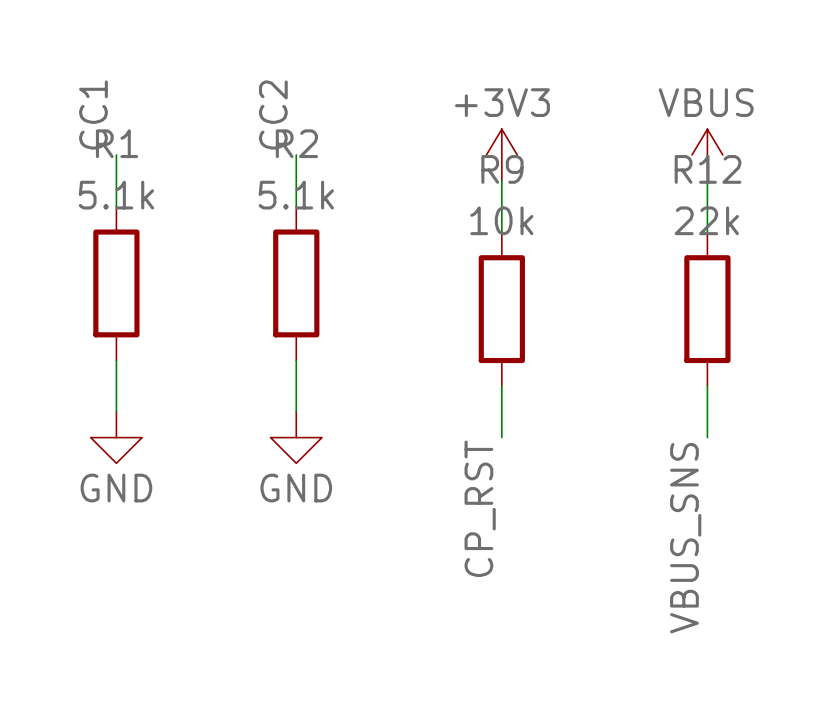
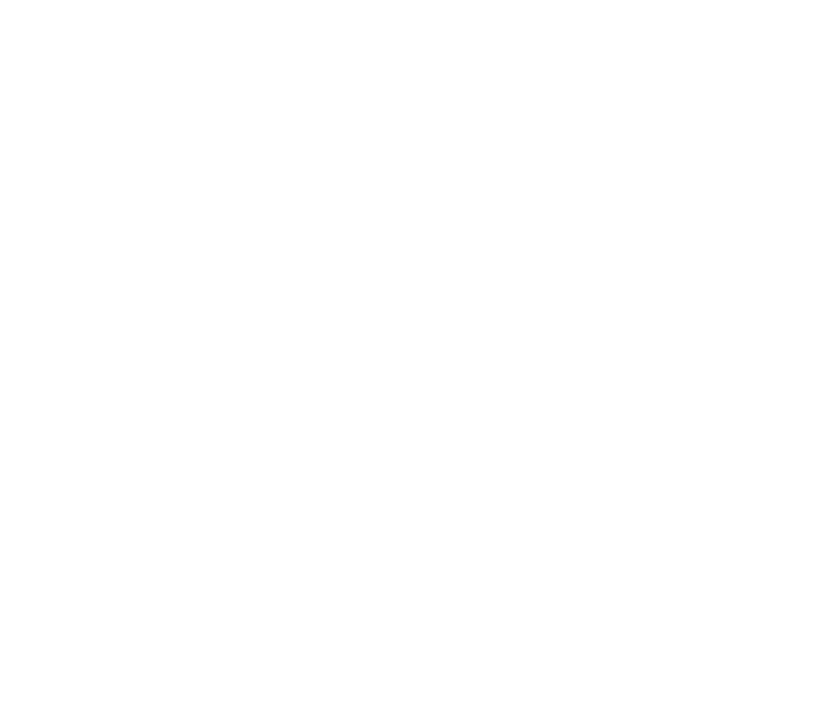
label: CC1 (93, 115) -> none
label: CC2 (273, 115) -> none
wire: (116, 154) (116, 206) -> none
wire: (296, 154) (296, 206) -> none
power symbol: +3V3 (501, 154) -> none
power symbol: VBUS (707, 154) -> none
wire: (501, 180) (501, 232) -> none
wire: (707, 180) (707, 232) -> none
R1: 5.1k (116, 283) -> none
R2: 5.1k (296, 283) -> none
R9: 10k (501, 309) -> none
R12: 22k (707, 309) -> none
wire: (116, 360) (116, 411) -> none
wire: (296, 360) (296, 411) -> none
wire: (501, 386) (501, 437) -> none
wire: (707, 386) (707, 437) -> none
power symbol: GND (116, 437) -> none
power symbol: GND (296, 437) -> none
label: CP_RST (480, 508) -> none
label: VBUS_SNS (685, 538) -> none

